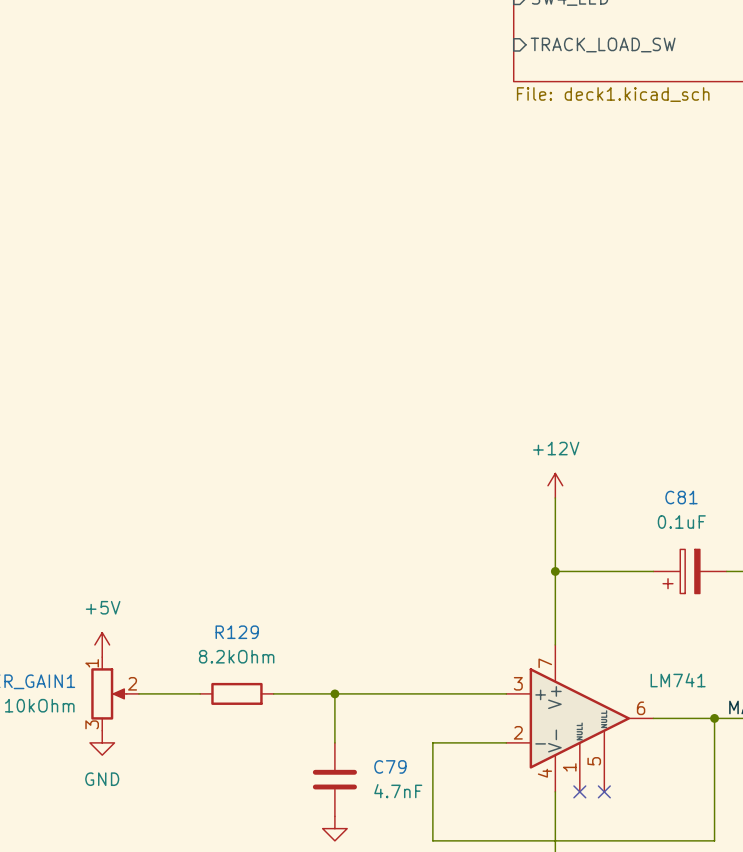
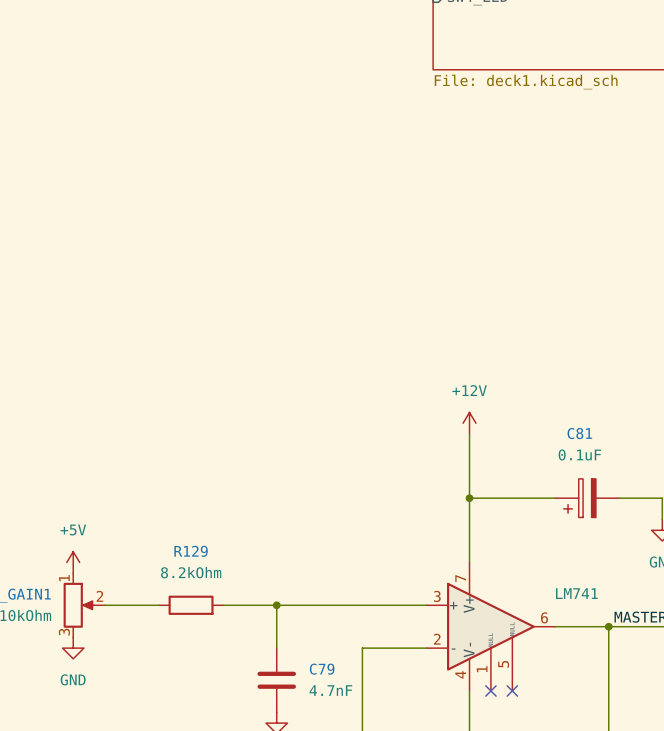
sheet pin: TRACK_LOAD_SW (603, 45) -> none

